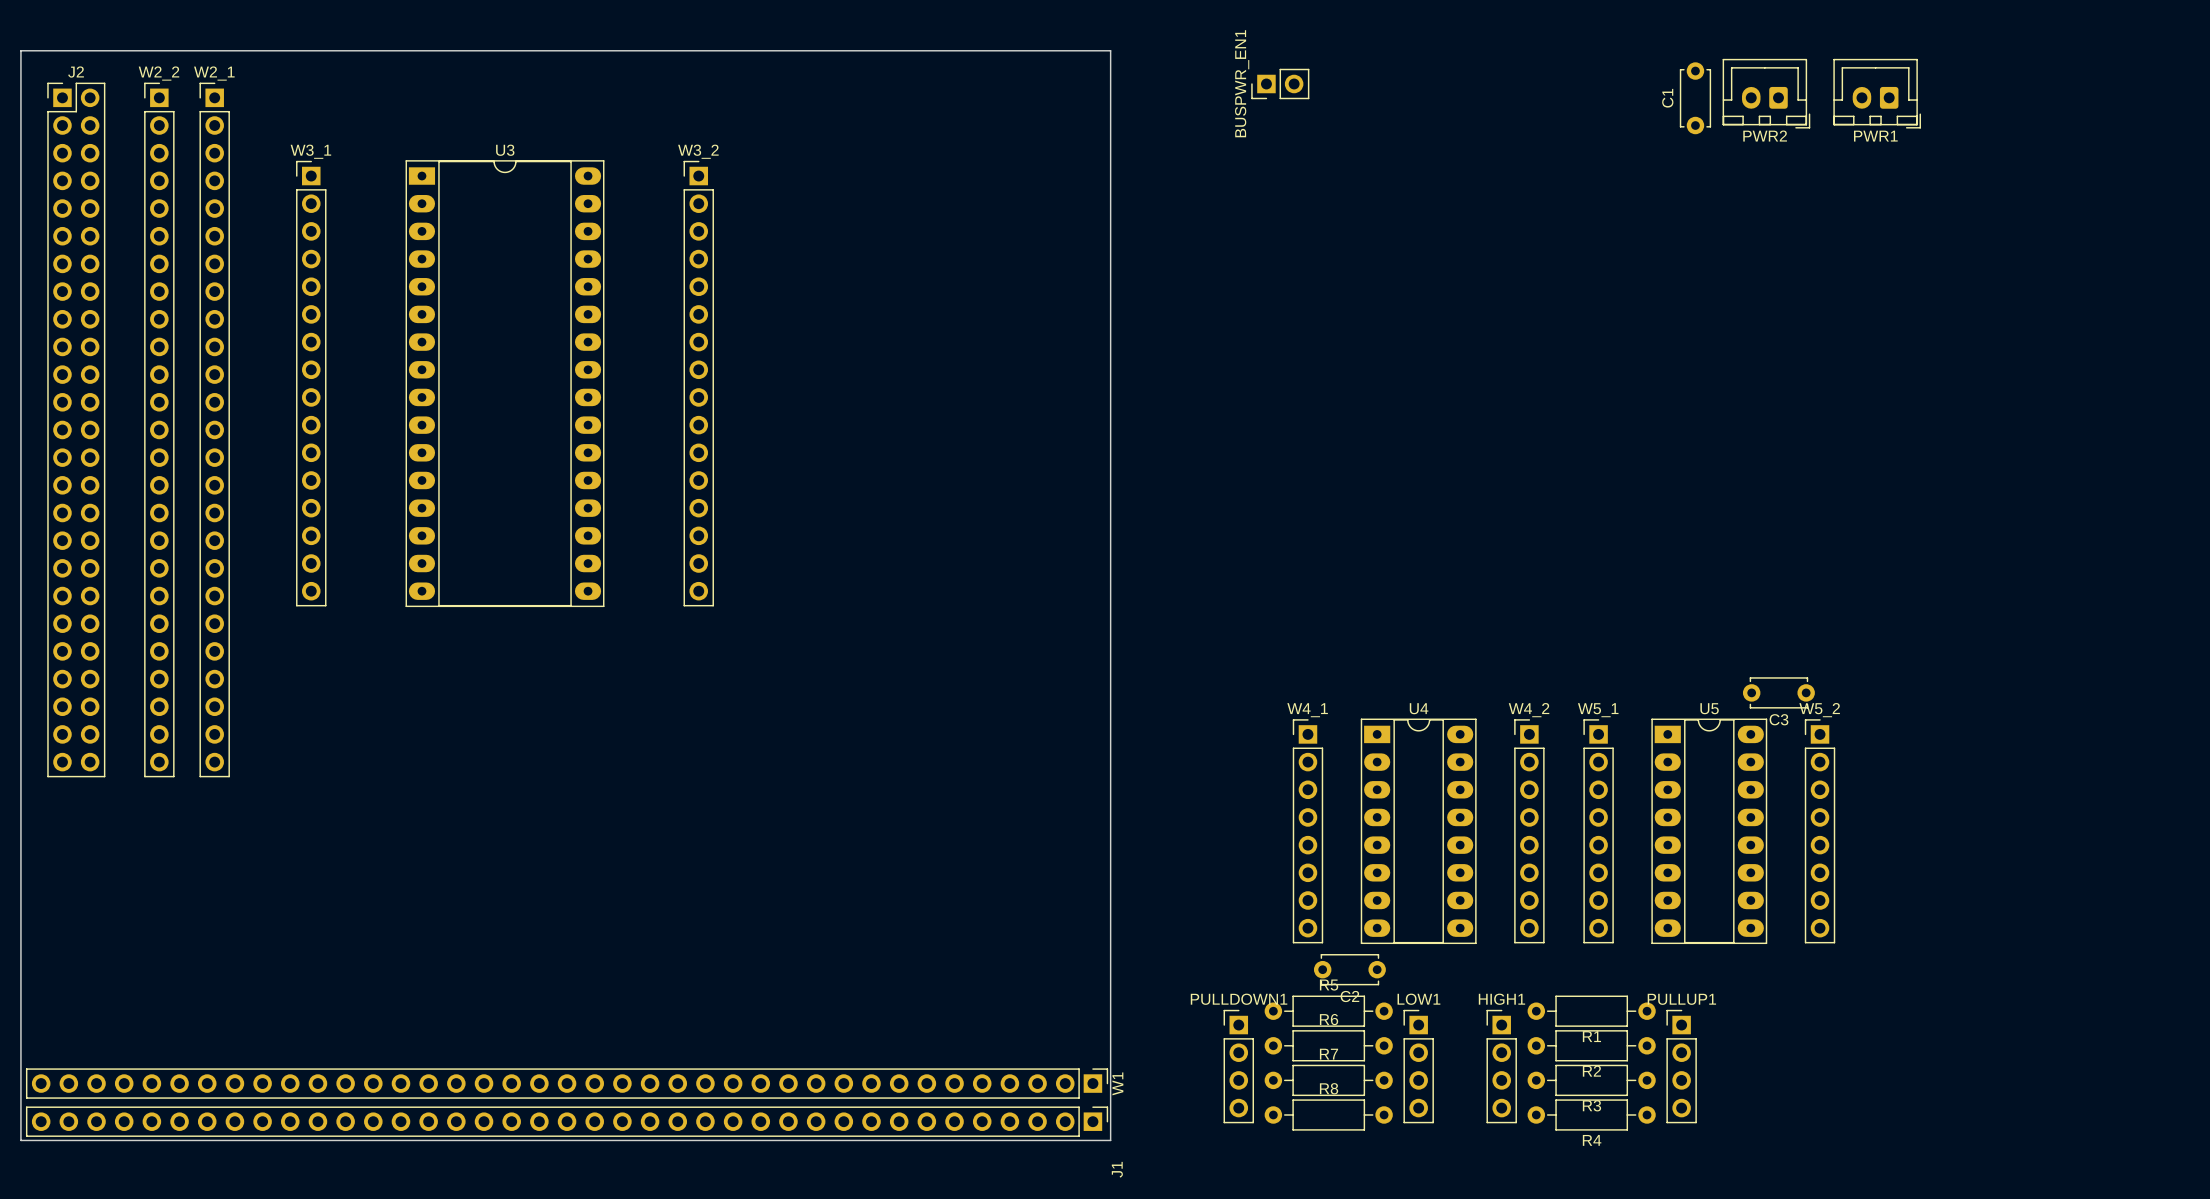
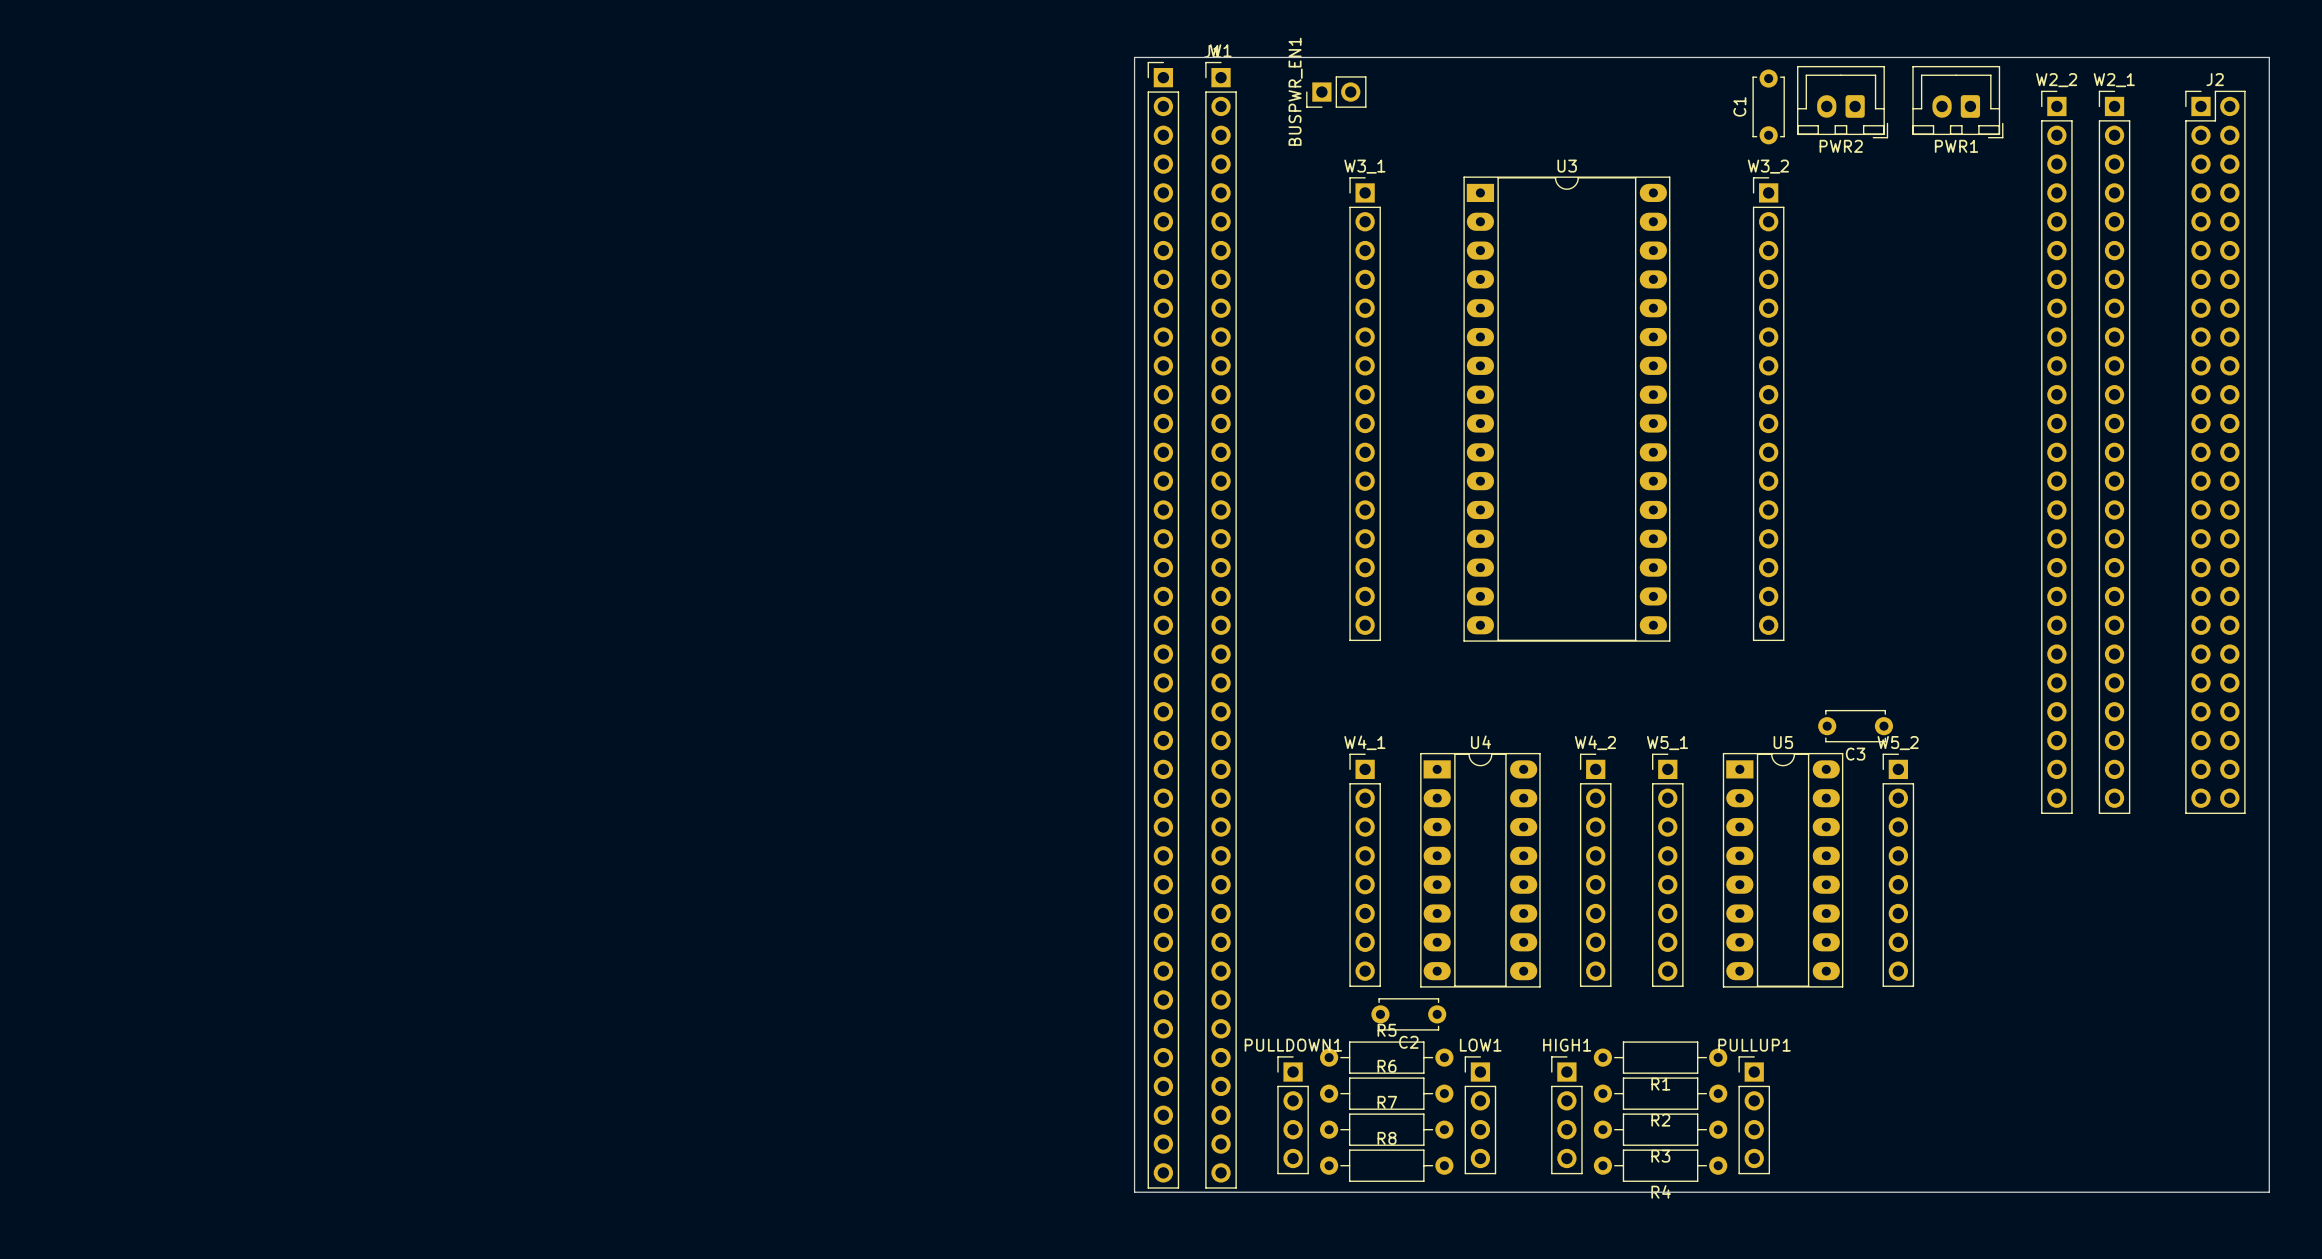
board edge: (1086, 50) (20, 50) (20, 1140) (1086, 1140) -> (1134, 57) (1134, 1192)
board edge: (1110, 50) (1110, 1140) -> (1159, 57) (2269, 57) (2269, 1192) (1159, 1192)
W3_1 position: (311, 383) -> (1365, 409)
U3 position: (505, 383) -> (1566, 409)
W3_2 position: (698, 383) -> (1768, 409)
J2 position: (76, 429) -> (2215, 452)
W2_2 position: (159, 429) -> (2056, 452)
W2_1 position: (214, 429) -> (2114, 452)
W1 rotation: 0° (567, 1083) -> 90° counterclockwise (1221, 625)
W1 position: (567, 1083) -> (1221, 625)
J1 rotation: 0° (567, 1121) -> 90° counterclockwise (1163, 625)
J1 position: (567, 1121) -> (1163, 625)

